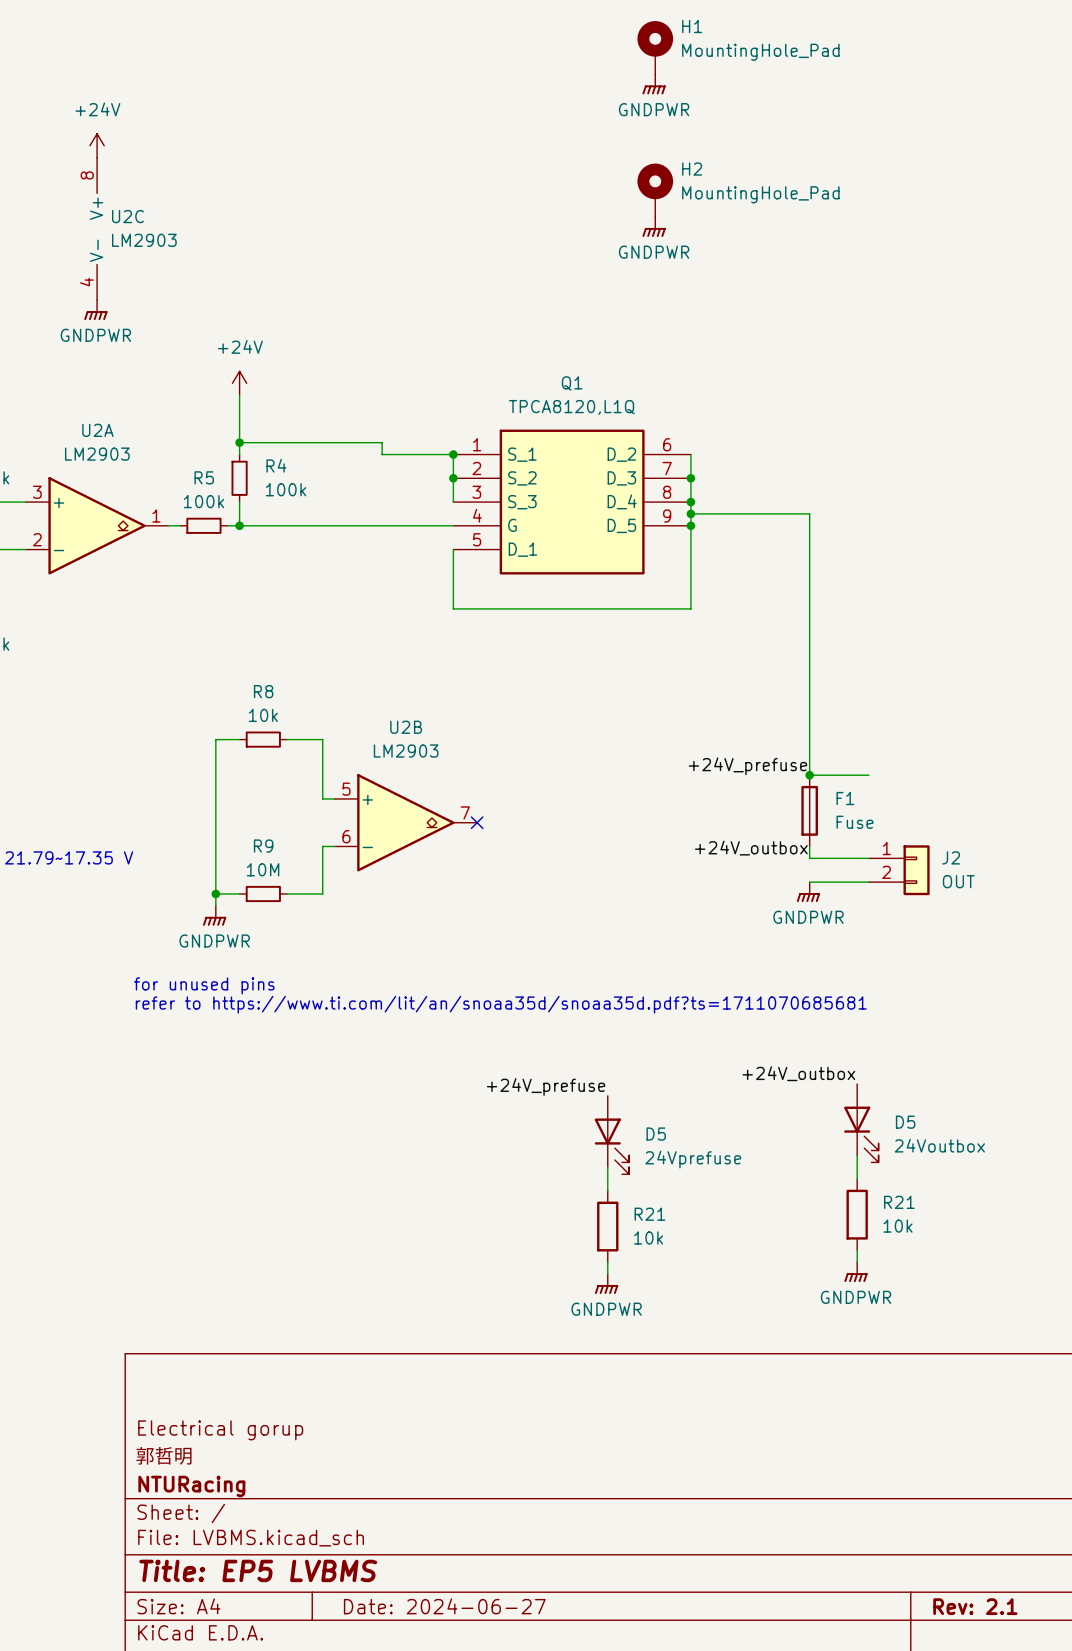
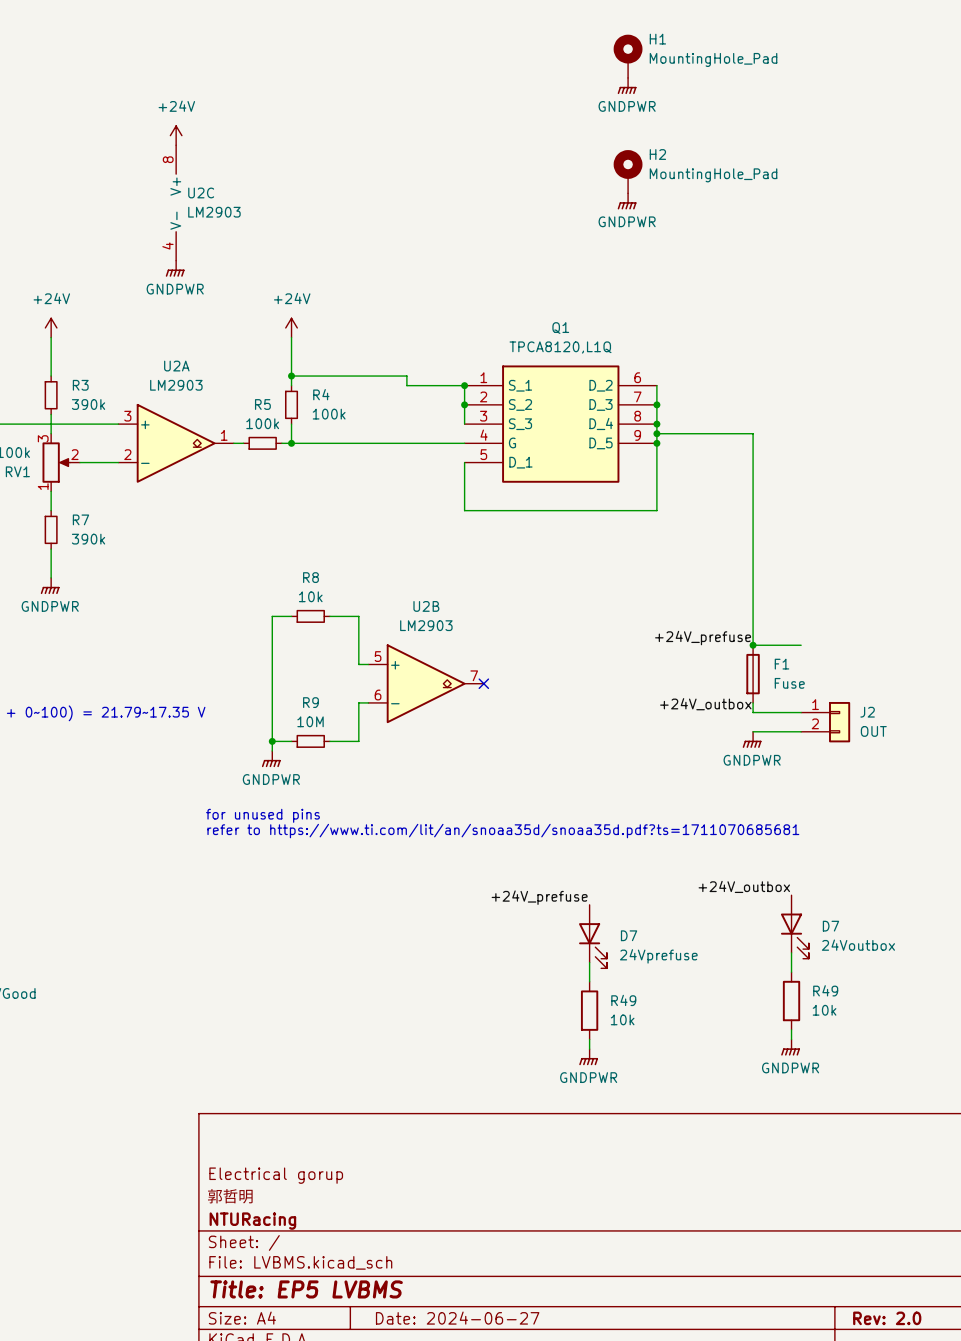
D5 name: D5 (905, 1122) -> D7 (830, 926)
D5 name: D5 (656, 1134) -> D7 (629, 935)
R21 name: R21 (899, 1202) -> R49 (825, 990)
R21 name: R21 (649, 1214) -> R49 (623, 1000)
title block: Rev: 2.1 (975, 1606) -> Rev: 2.0 (887, 1318)

